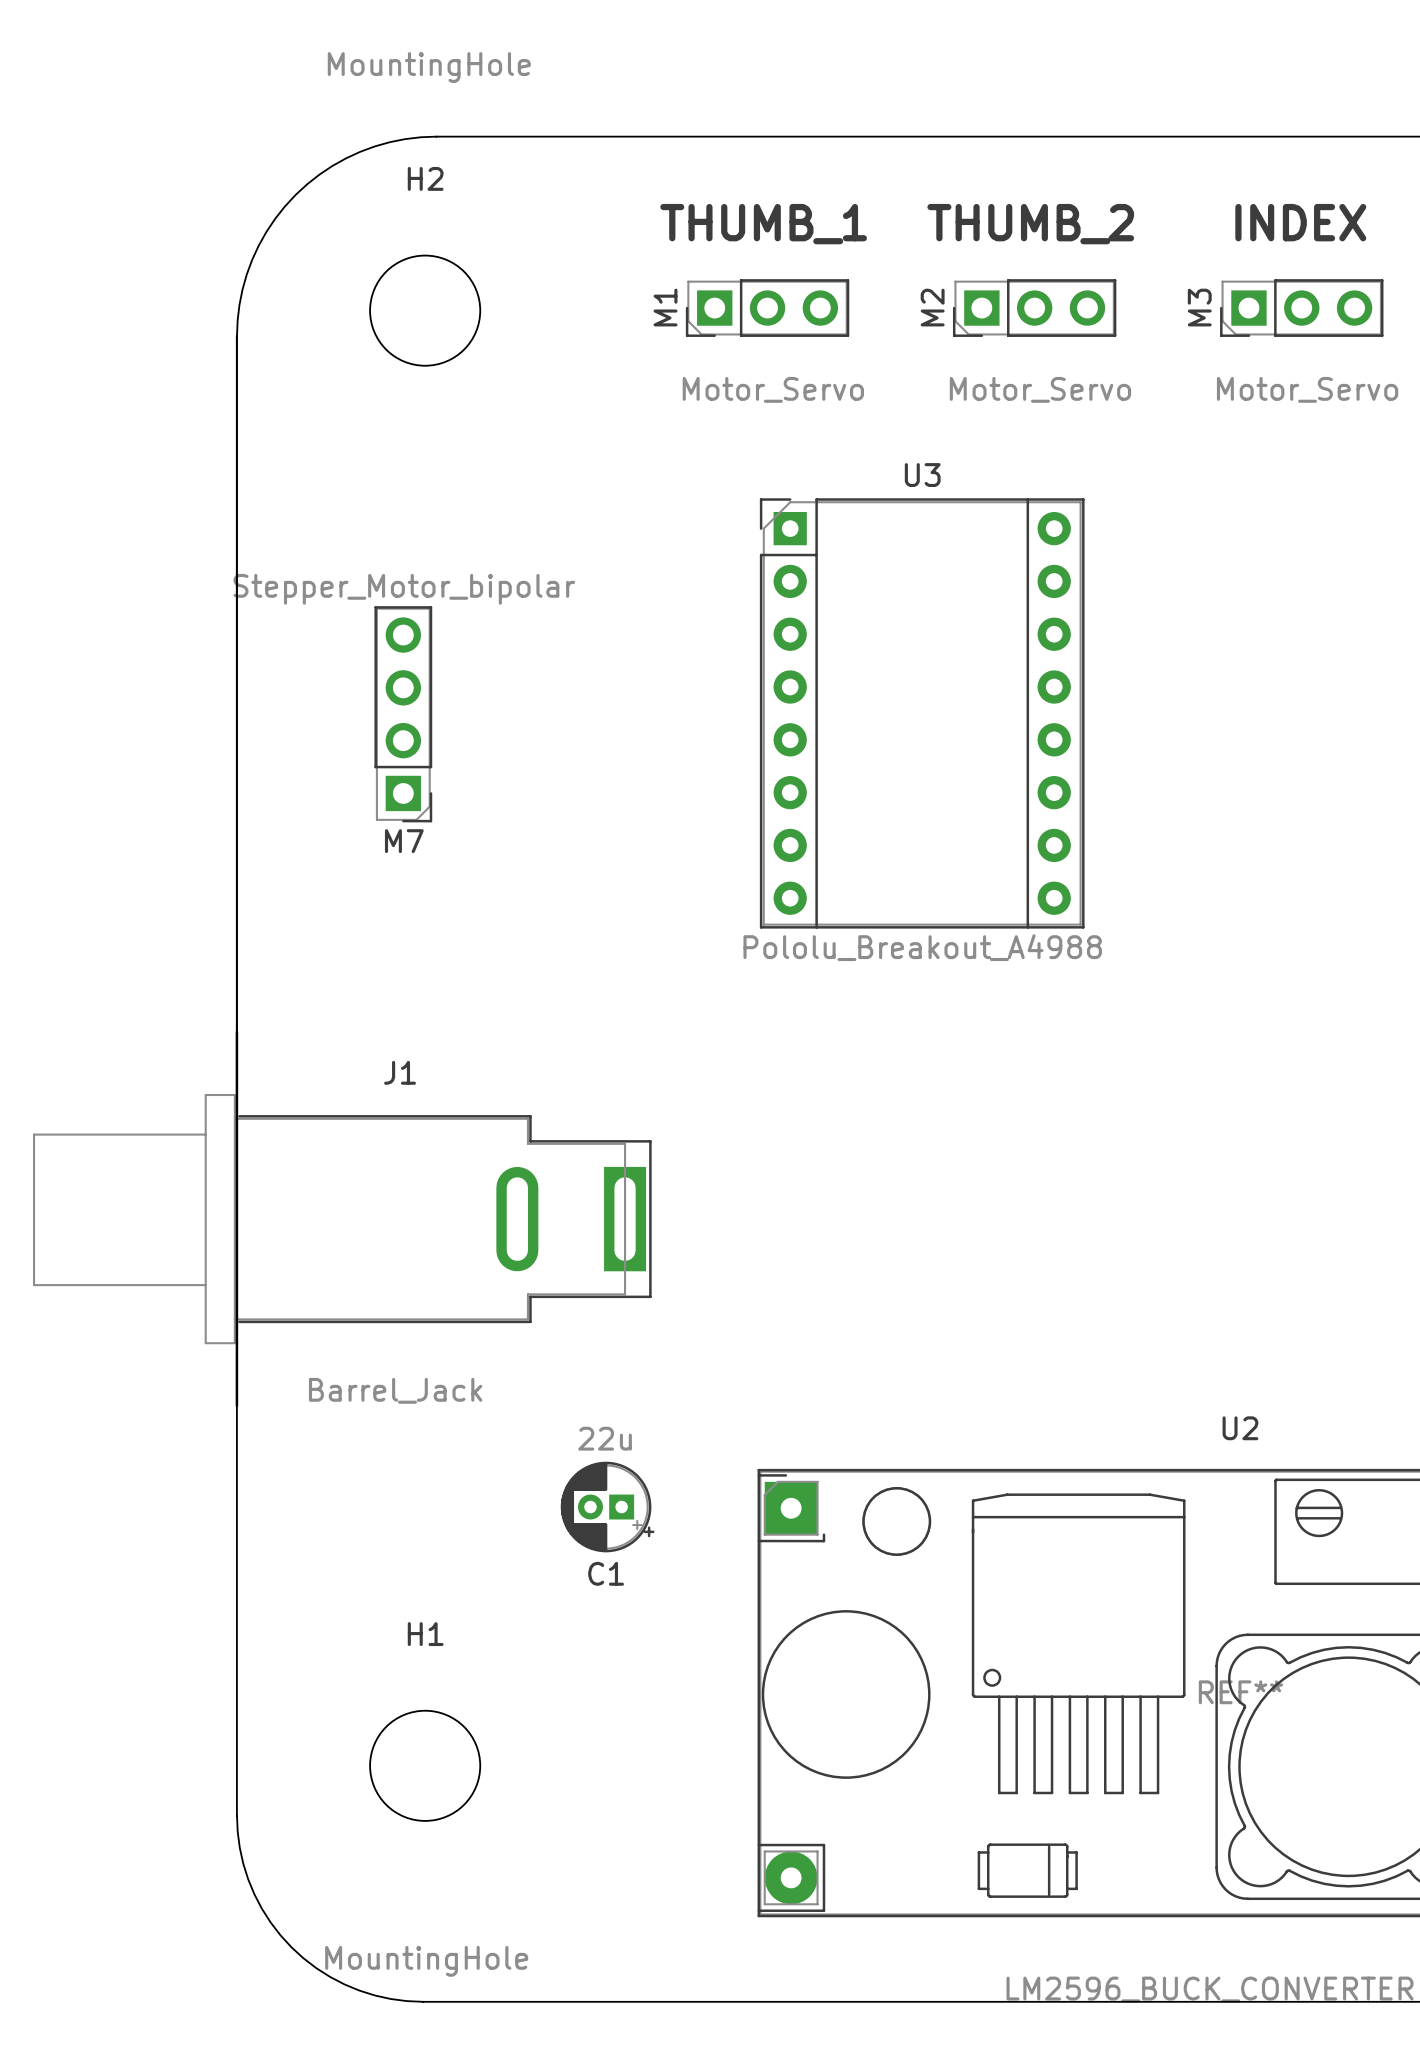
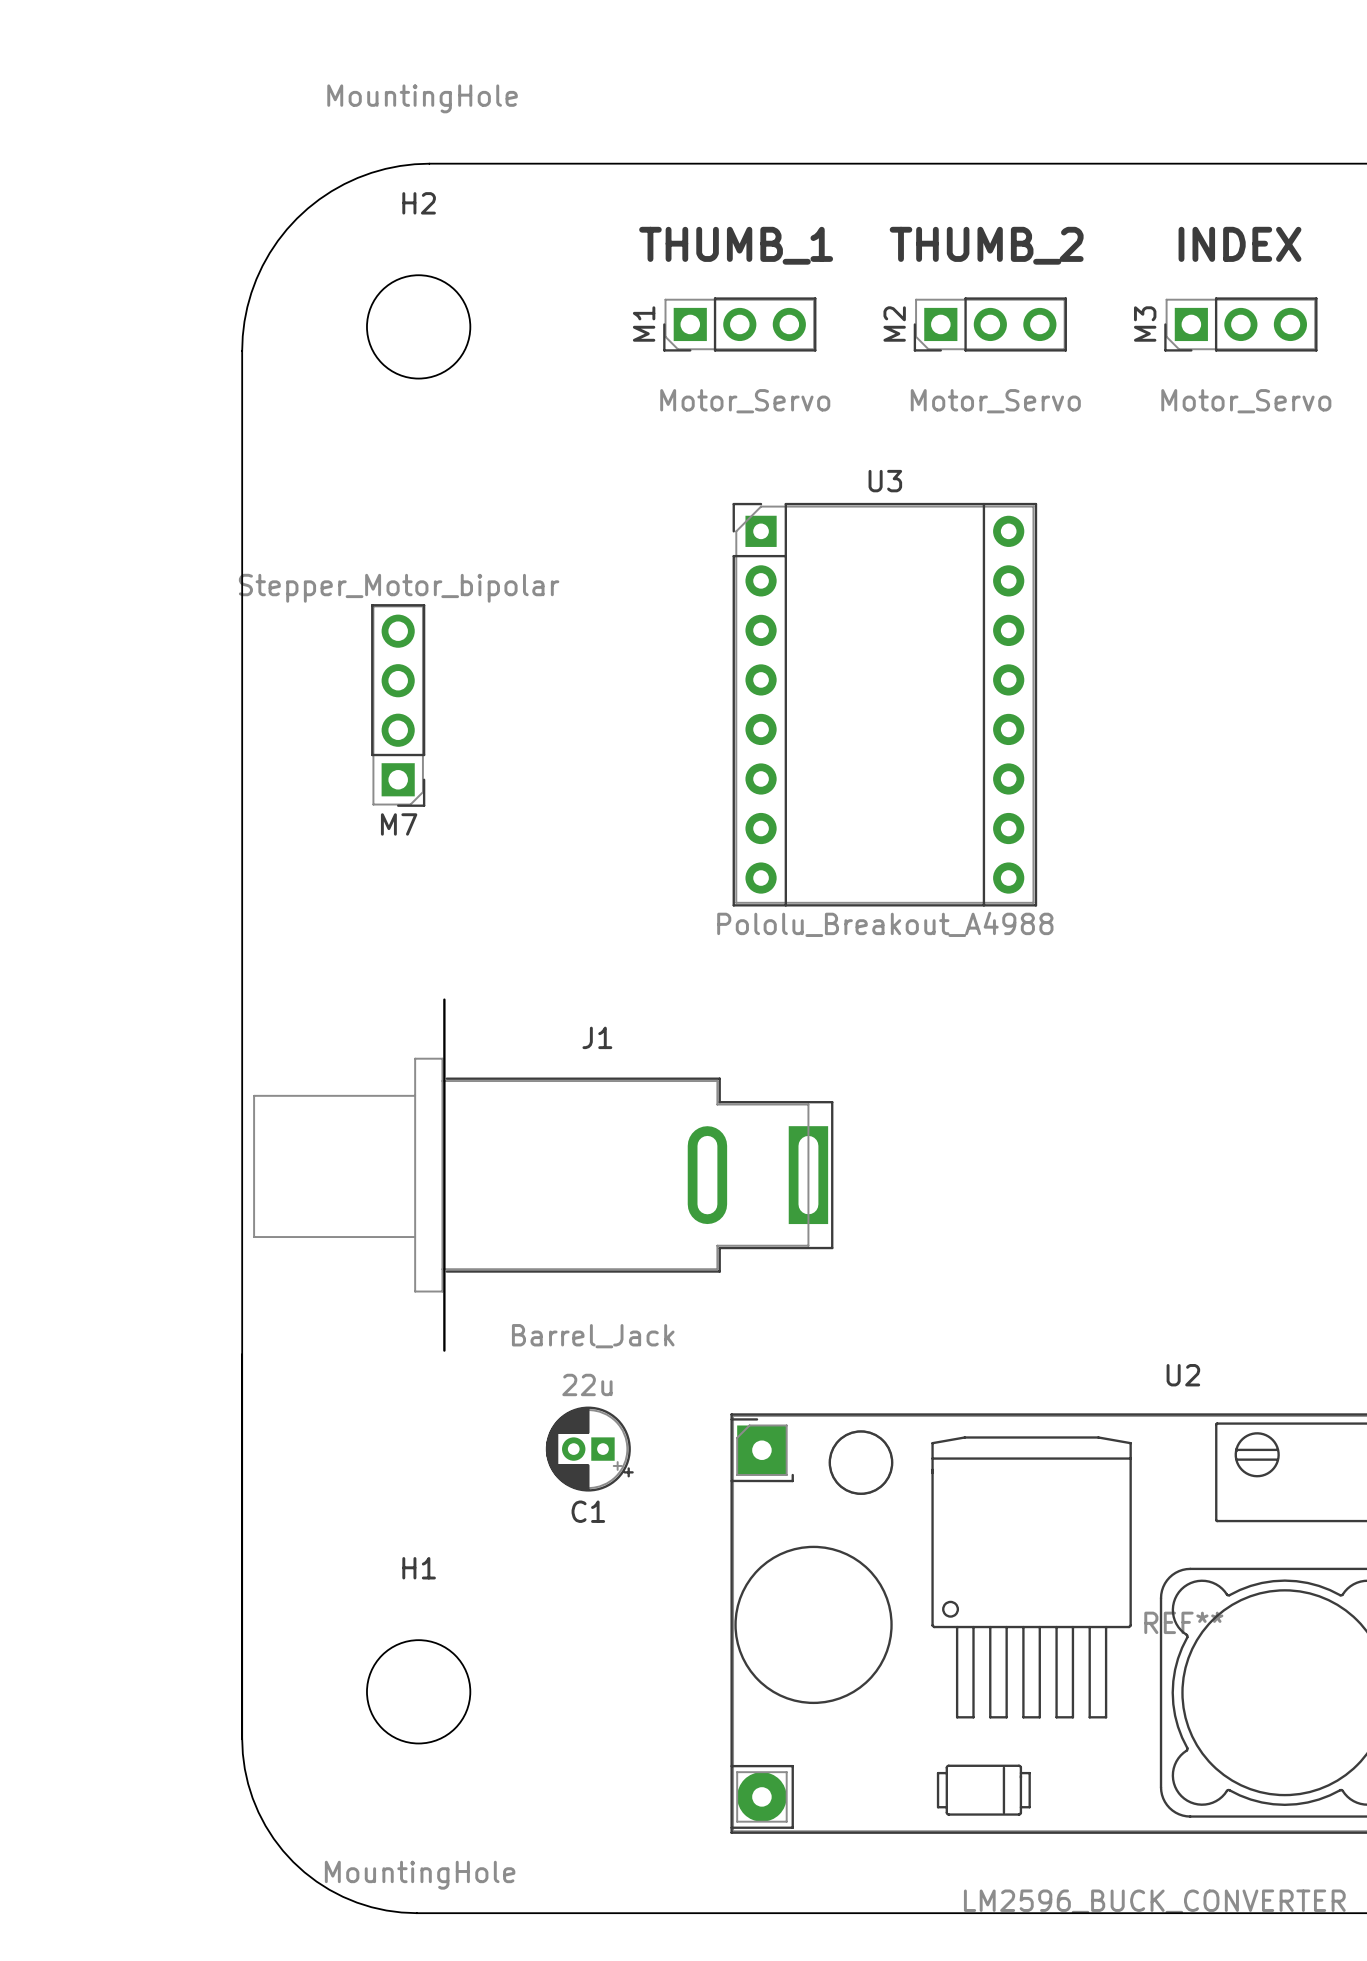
board edge: (236, 336) (236, 1032) -> (242, 350) (242, 1738)
J1 position: (342, 1219) -> (543, 1175)

